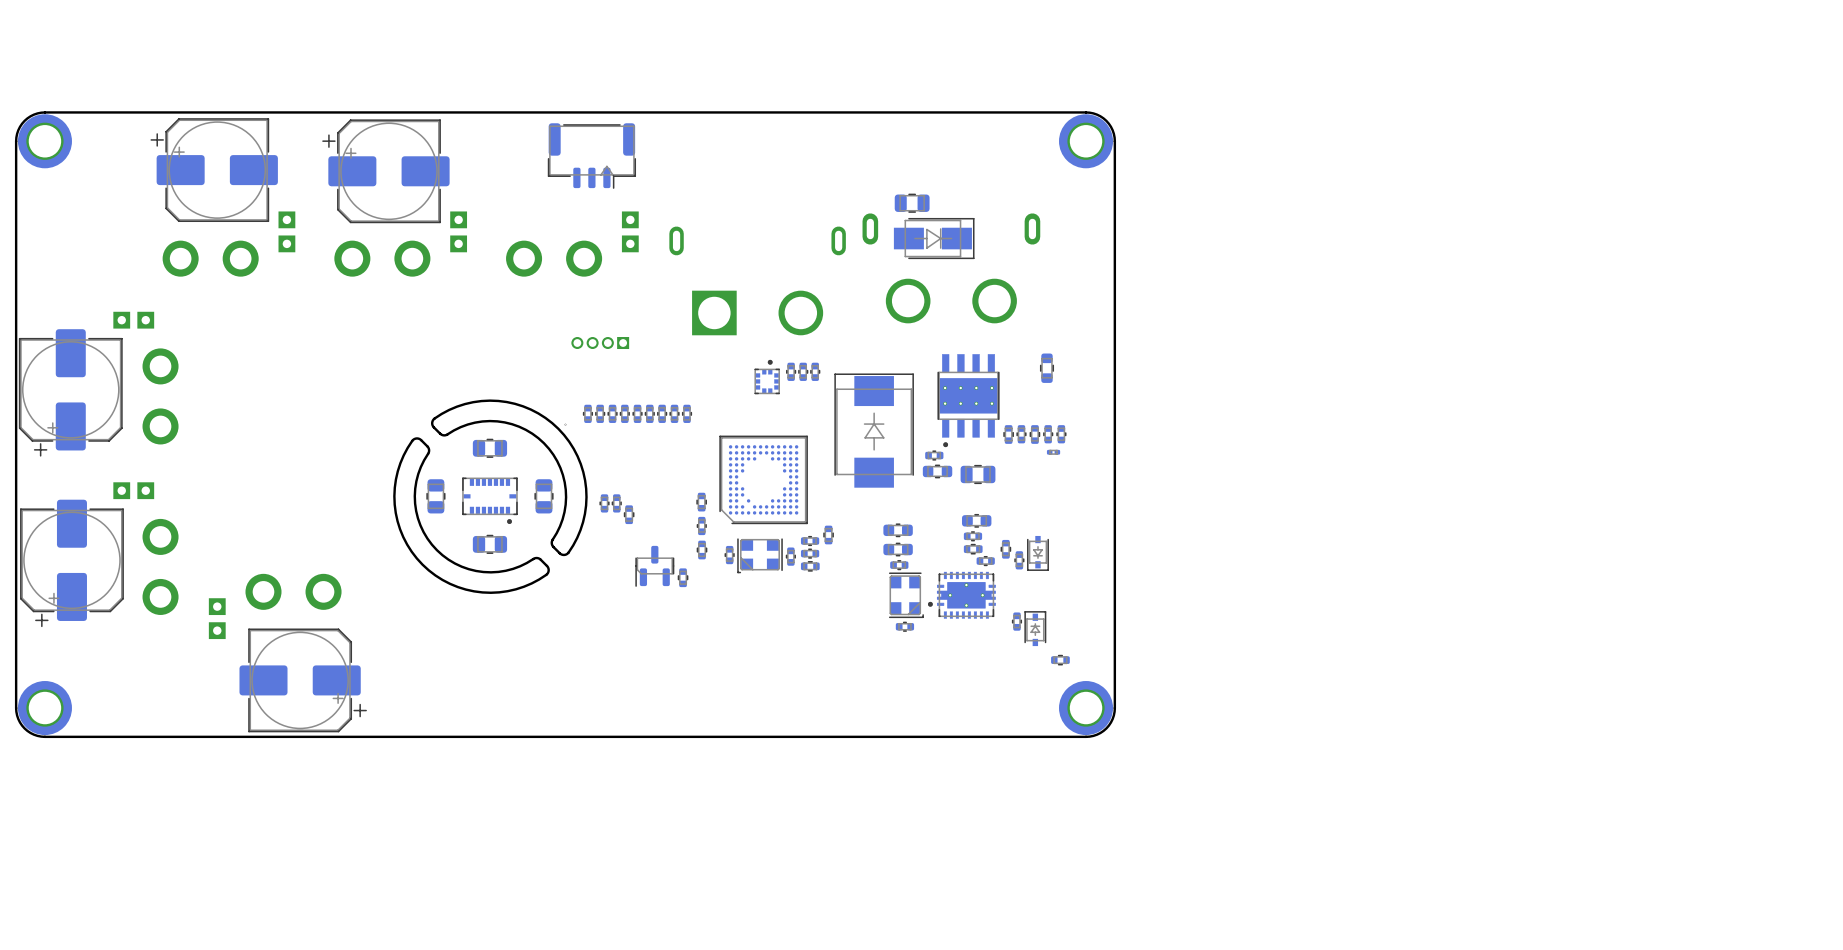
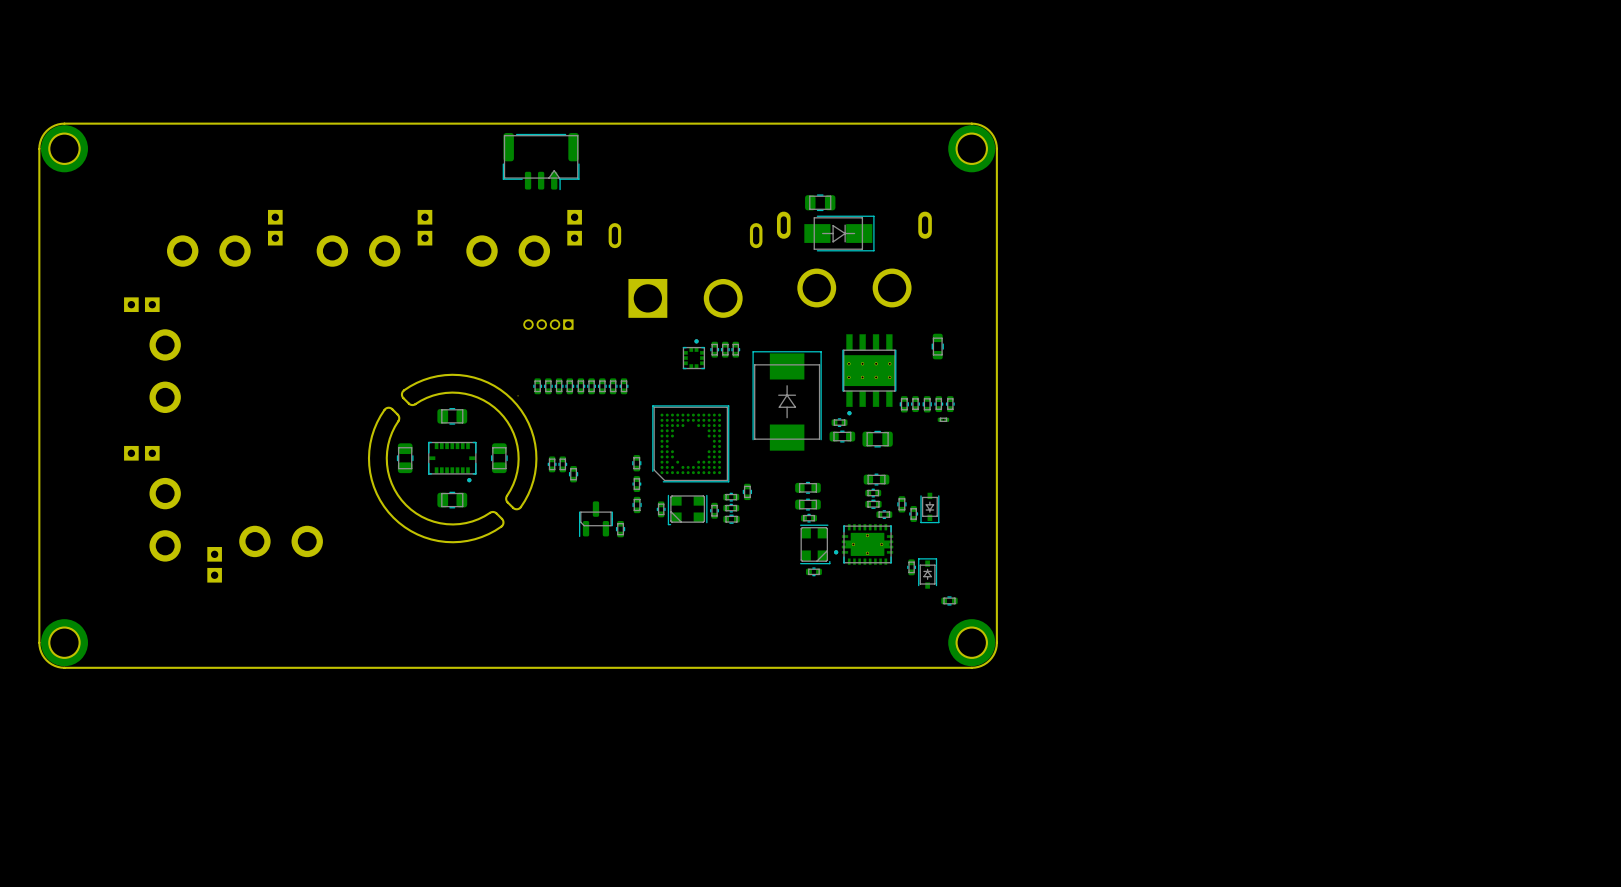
part: (214, 170) -> none
part: (385, 171) -> none
part: (70, 392) -> none
part: (71, 563) -> none
part: (303, 680) -> none

